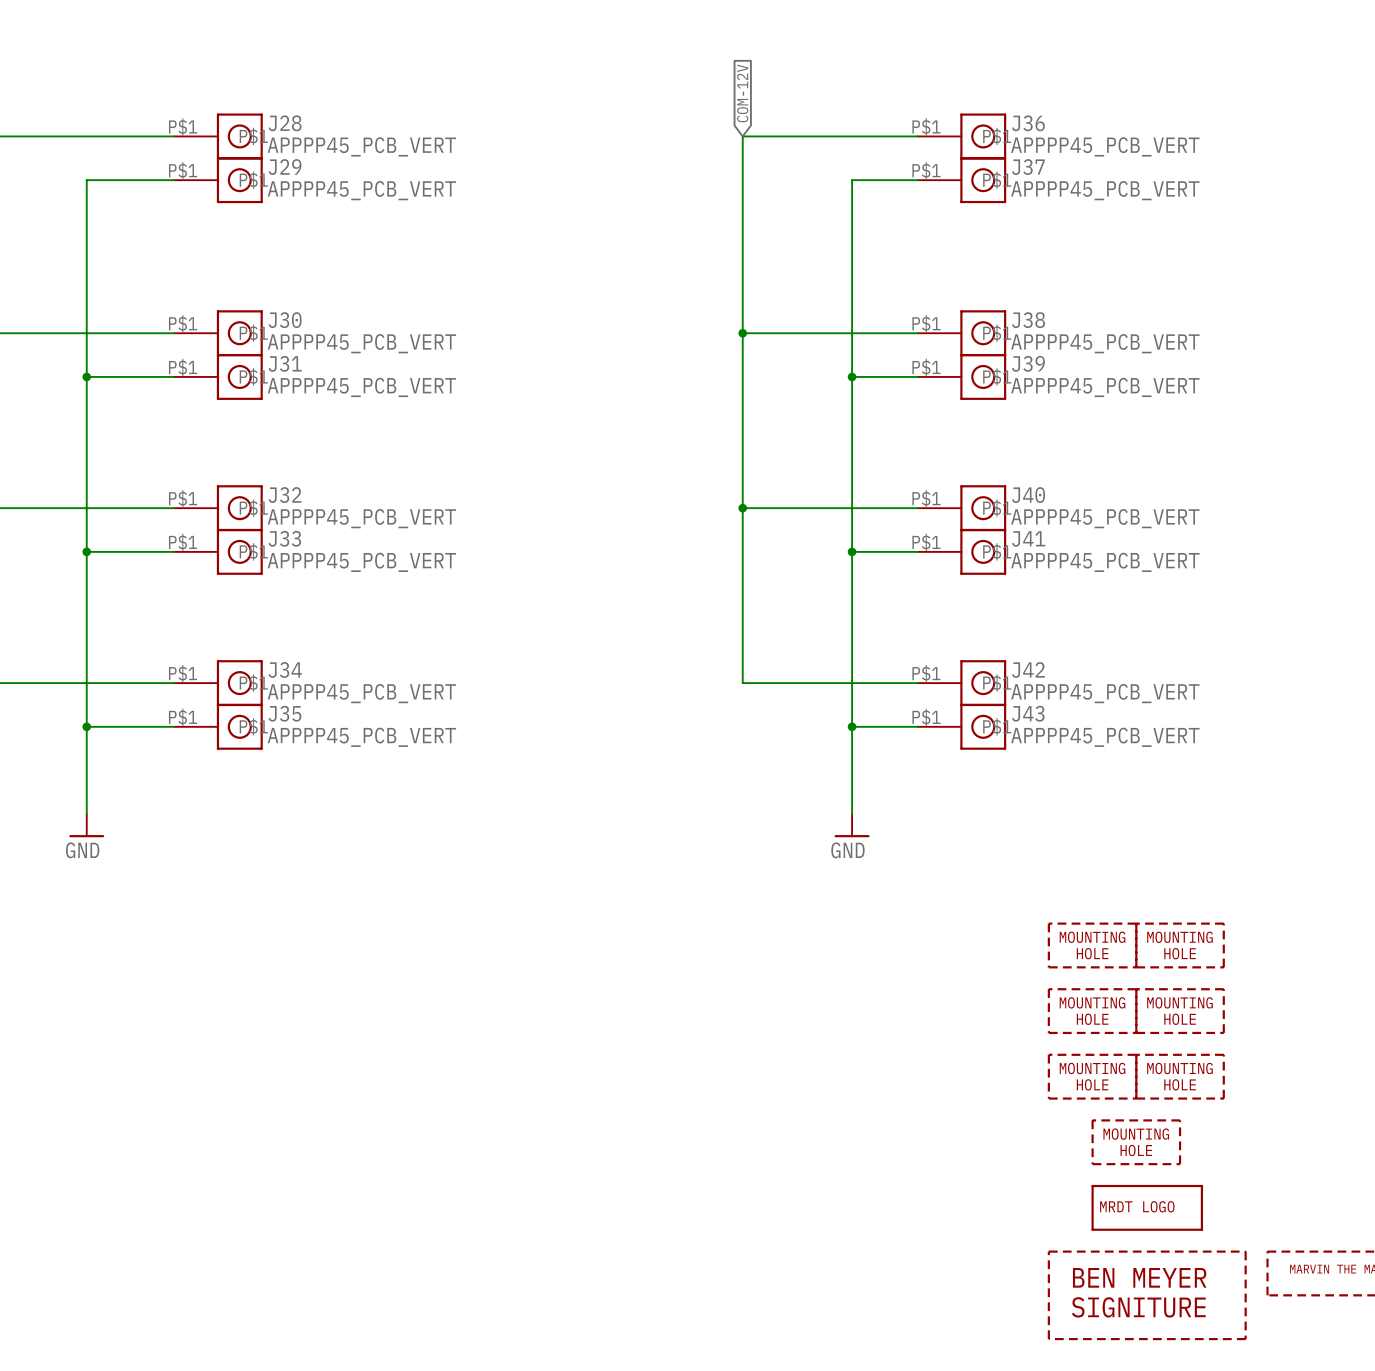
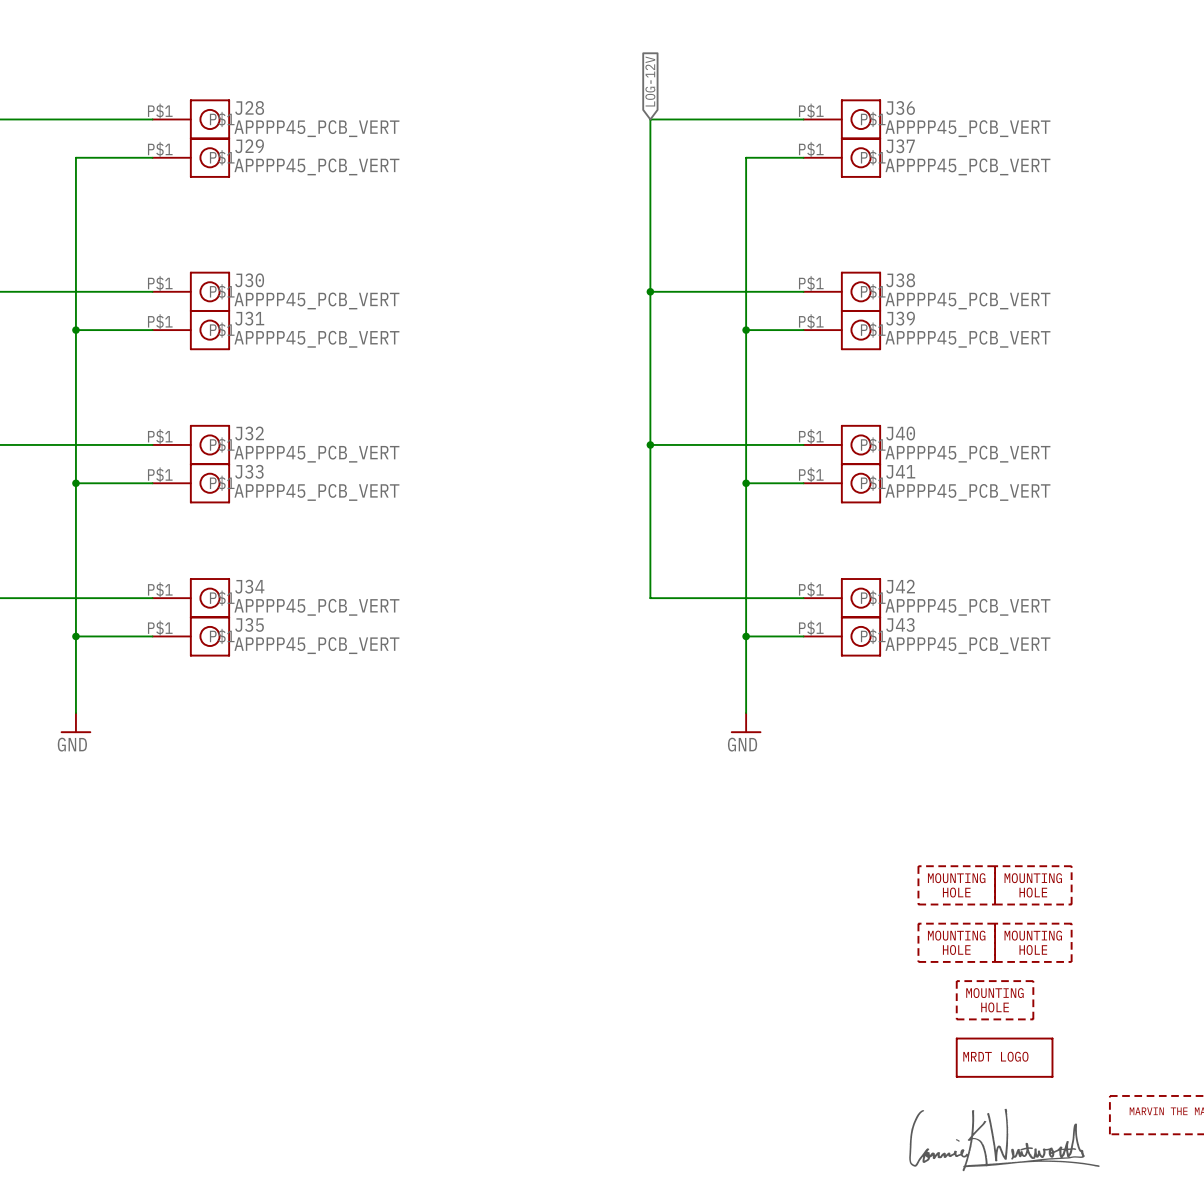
global label: COM-12V (742, 93) -> LOG-12V (650, 81)
part: (1092, 945) -> none
part: (1180, 945) -> none
part symbol: [1047, 1250, 1247, 1341] -> [909, 1108, 1100, 1172]

